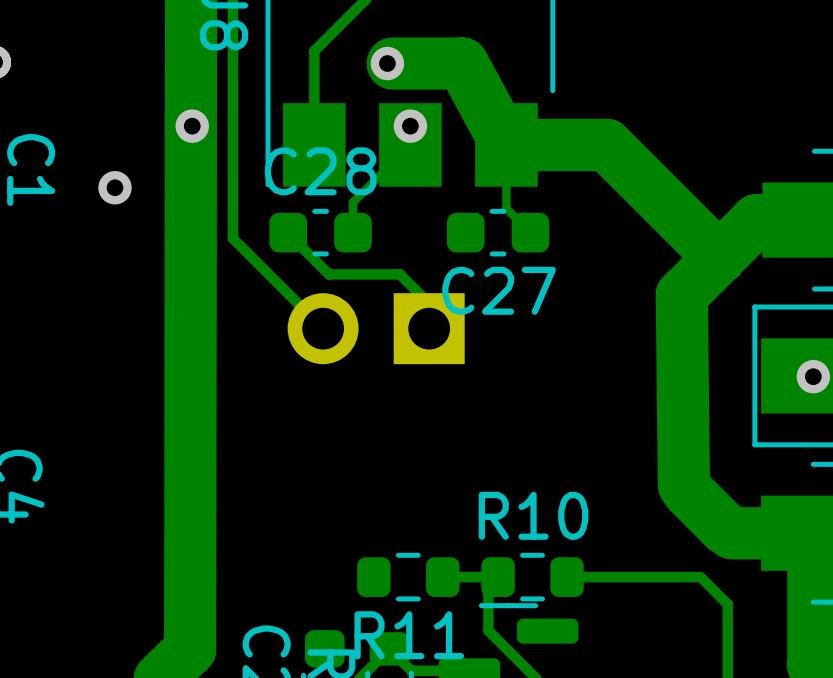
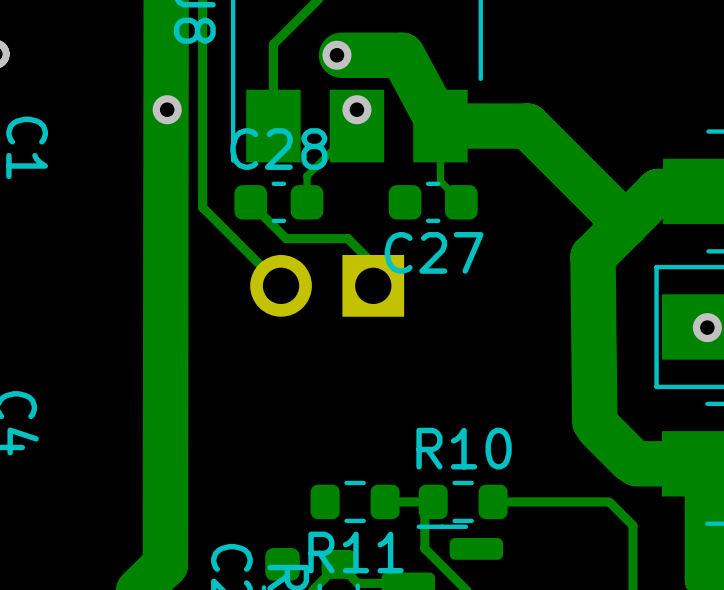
via: (114, 187) -> none

